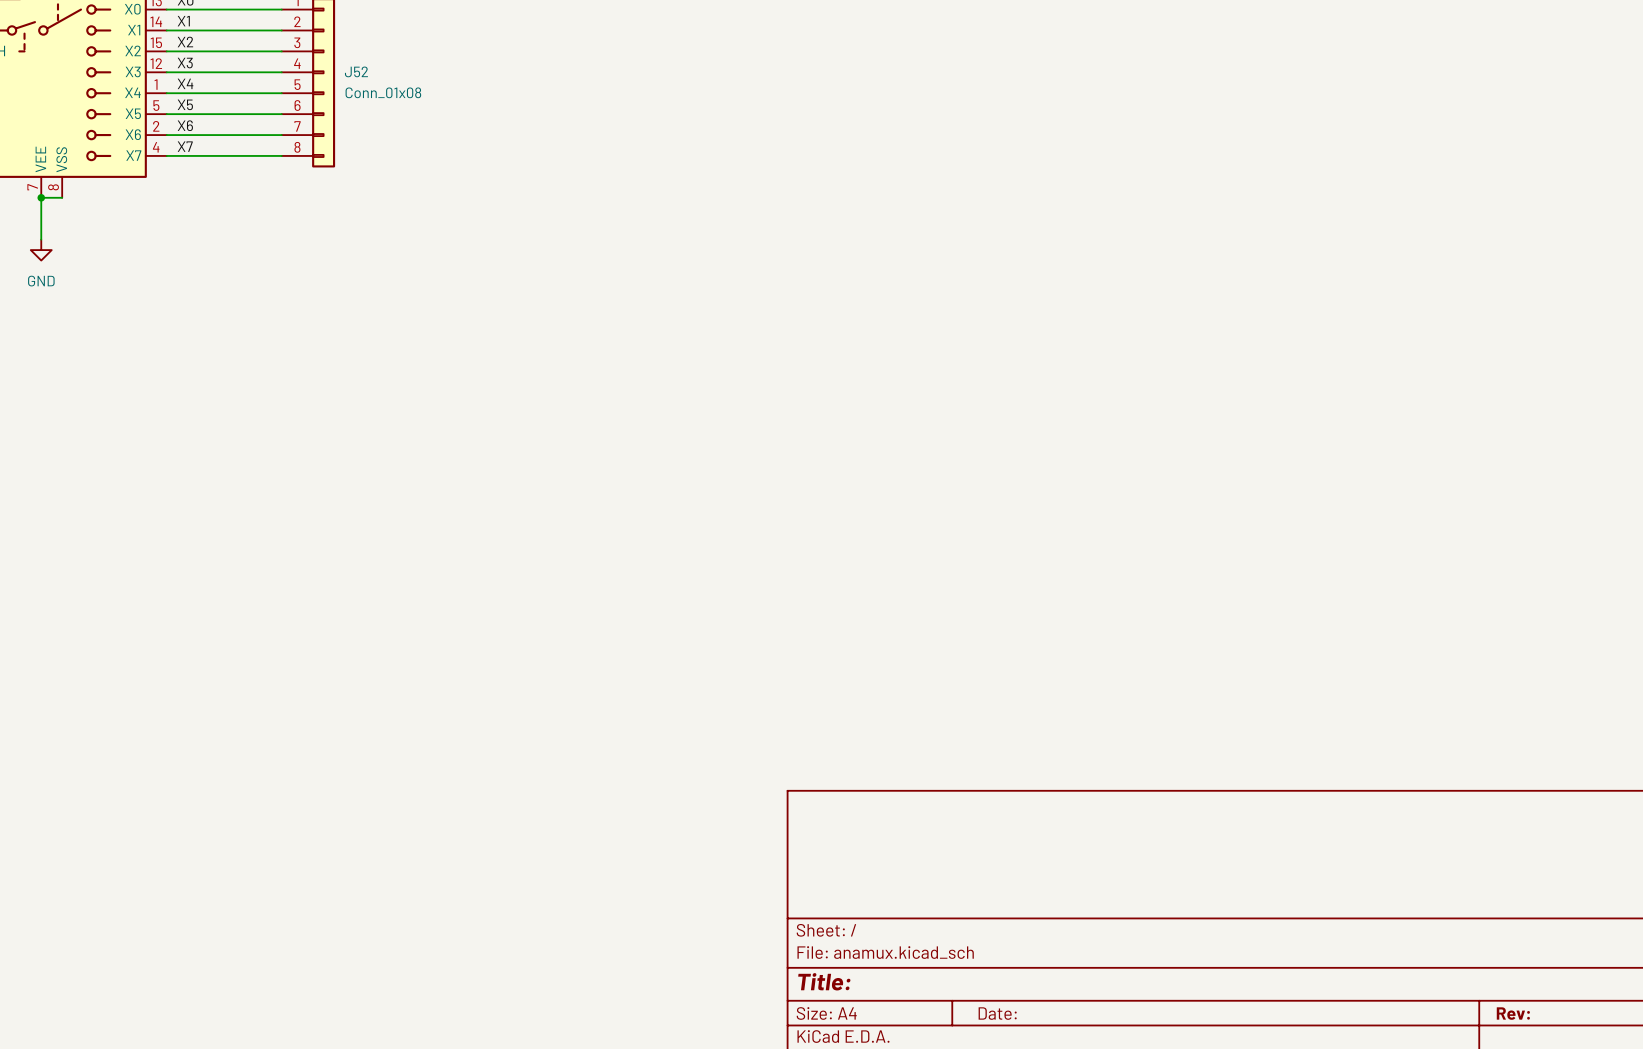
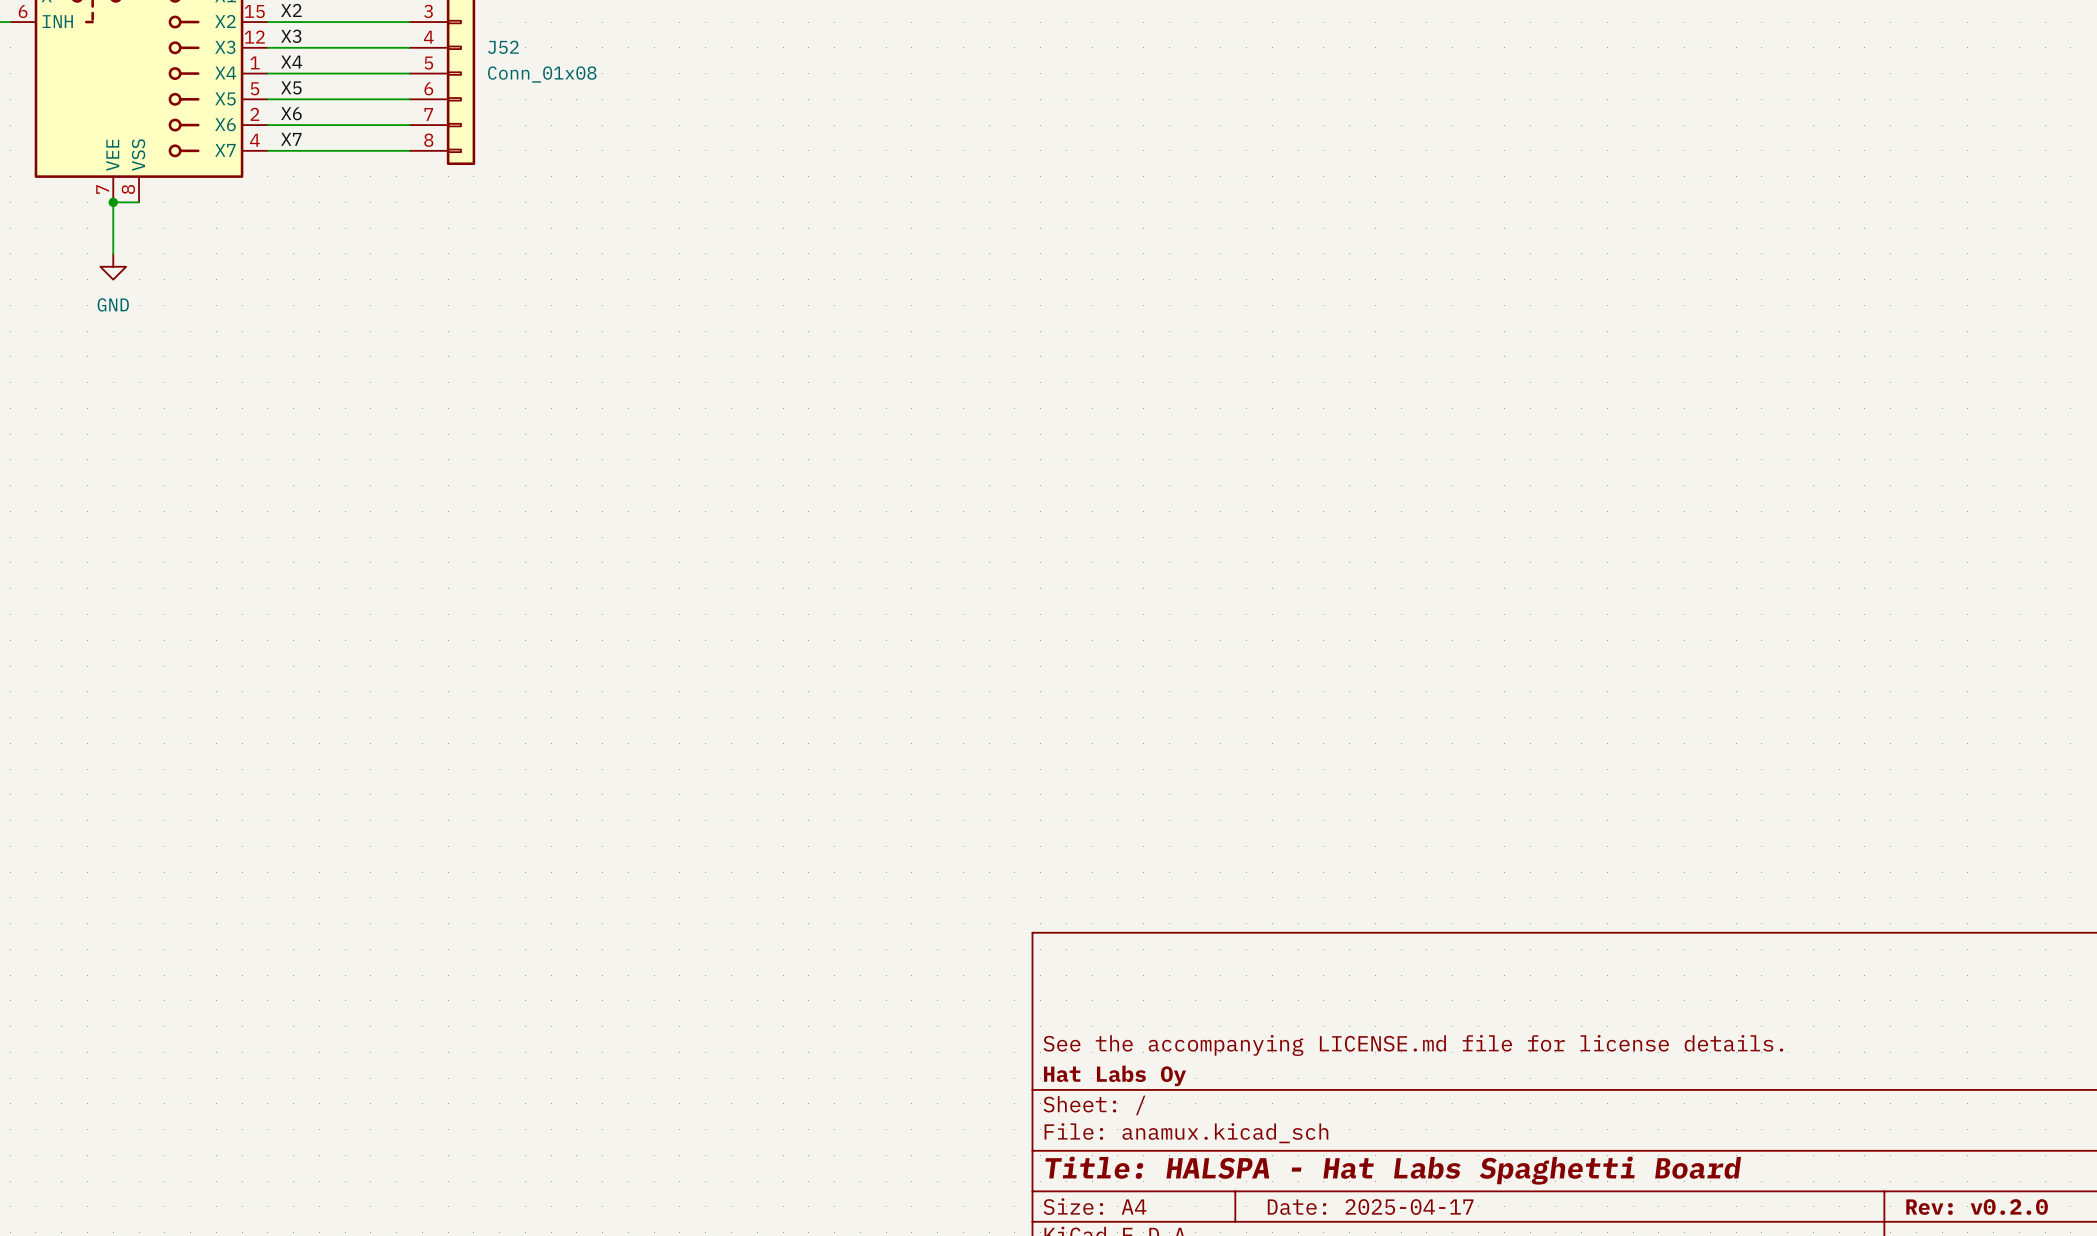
title block: none -> See the accompanying LICENSE.md file for license details. (1413, 1045)
title block: none -> Hat Labs Oy (1115, 1075)
title block: Title: (824, 981) -> Title: HALSPA - Hat Labs Spaghetti Board (1393, 1170)
title block: Date: (997, 1013) -> Date: 2025-04-17 (1370, 1207)
title block: Rev: (1513, 1013) -> Rev: v0.2.0 (1977, 1207)

